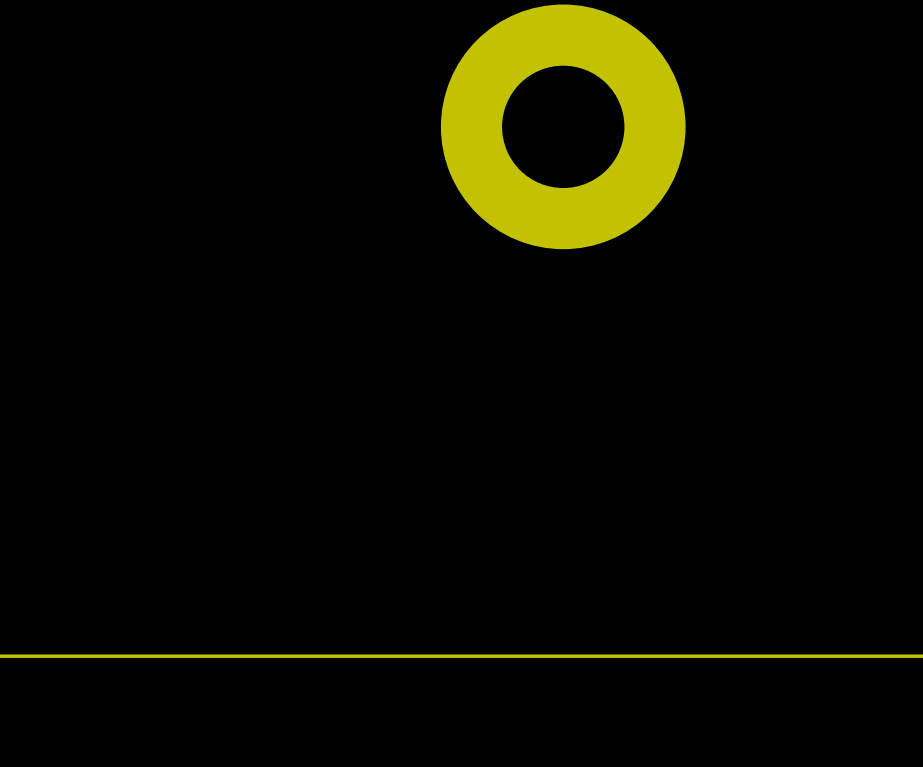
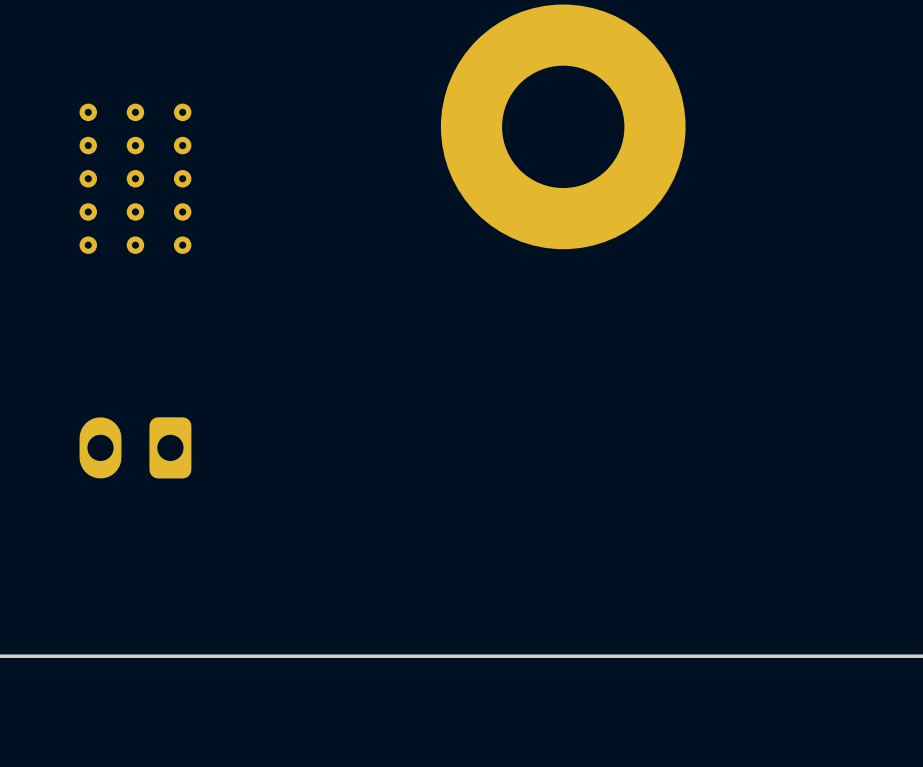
part: none -> (135, 178)
part: none -> (135, 447)

